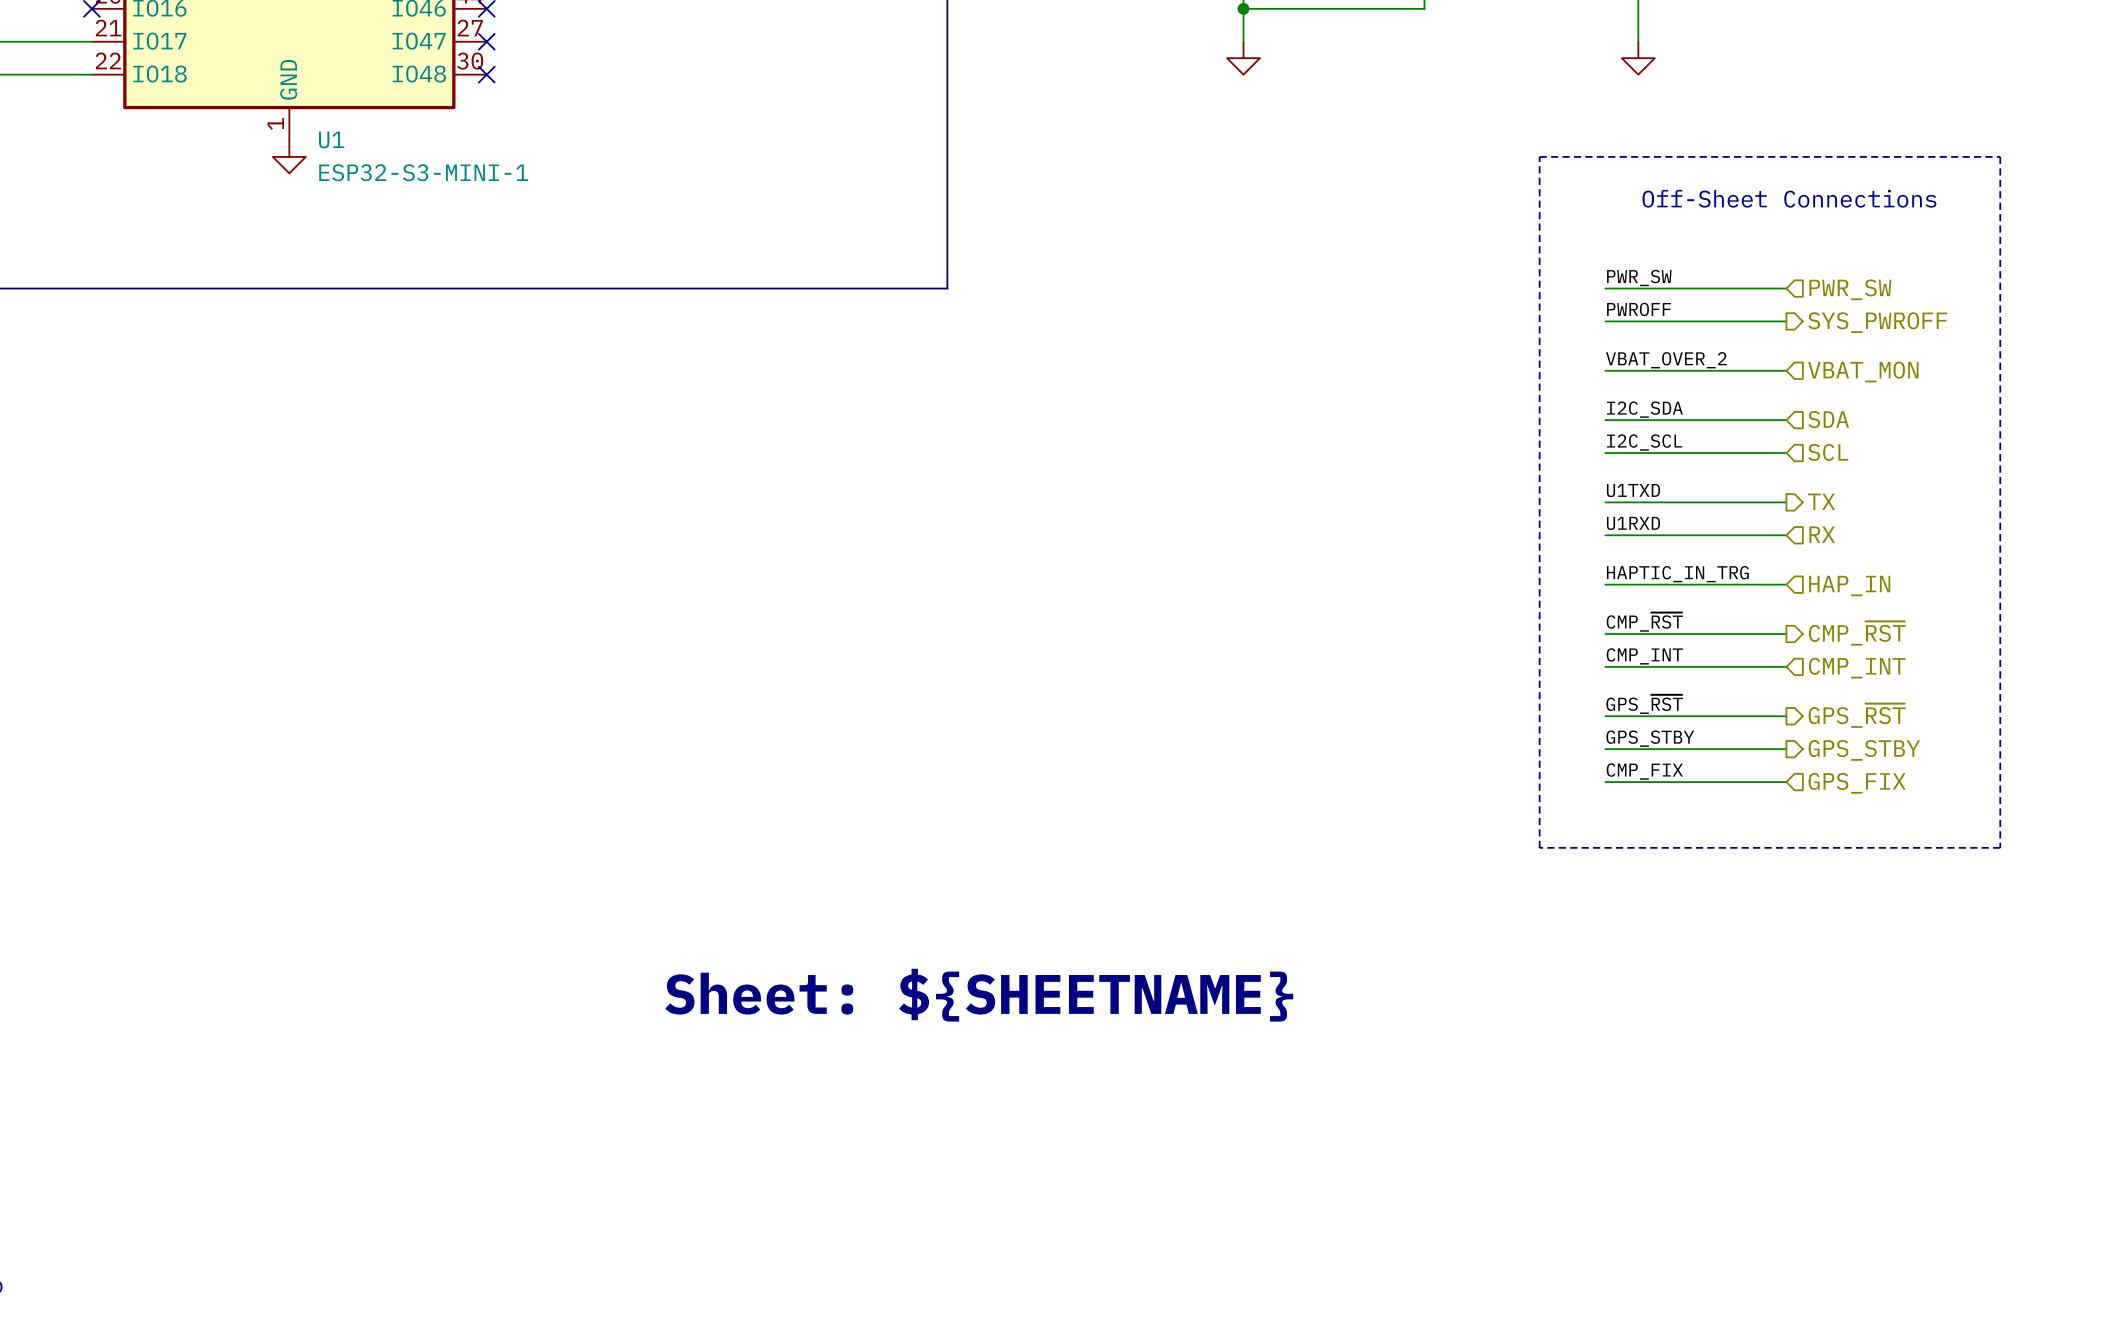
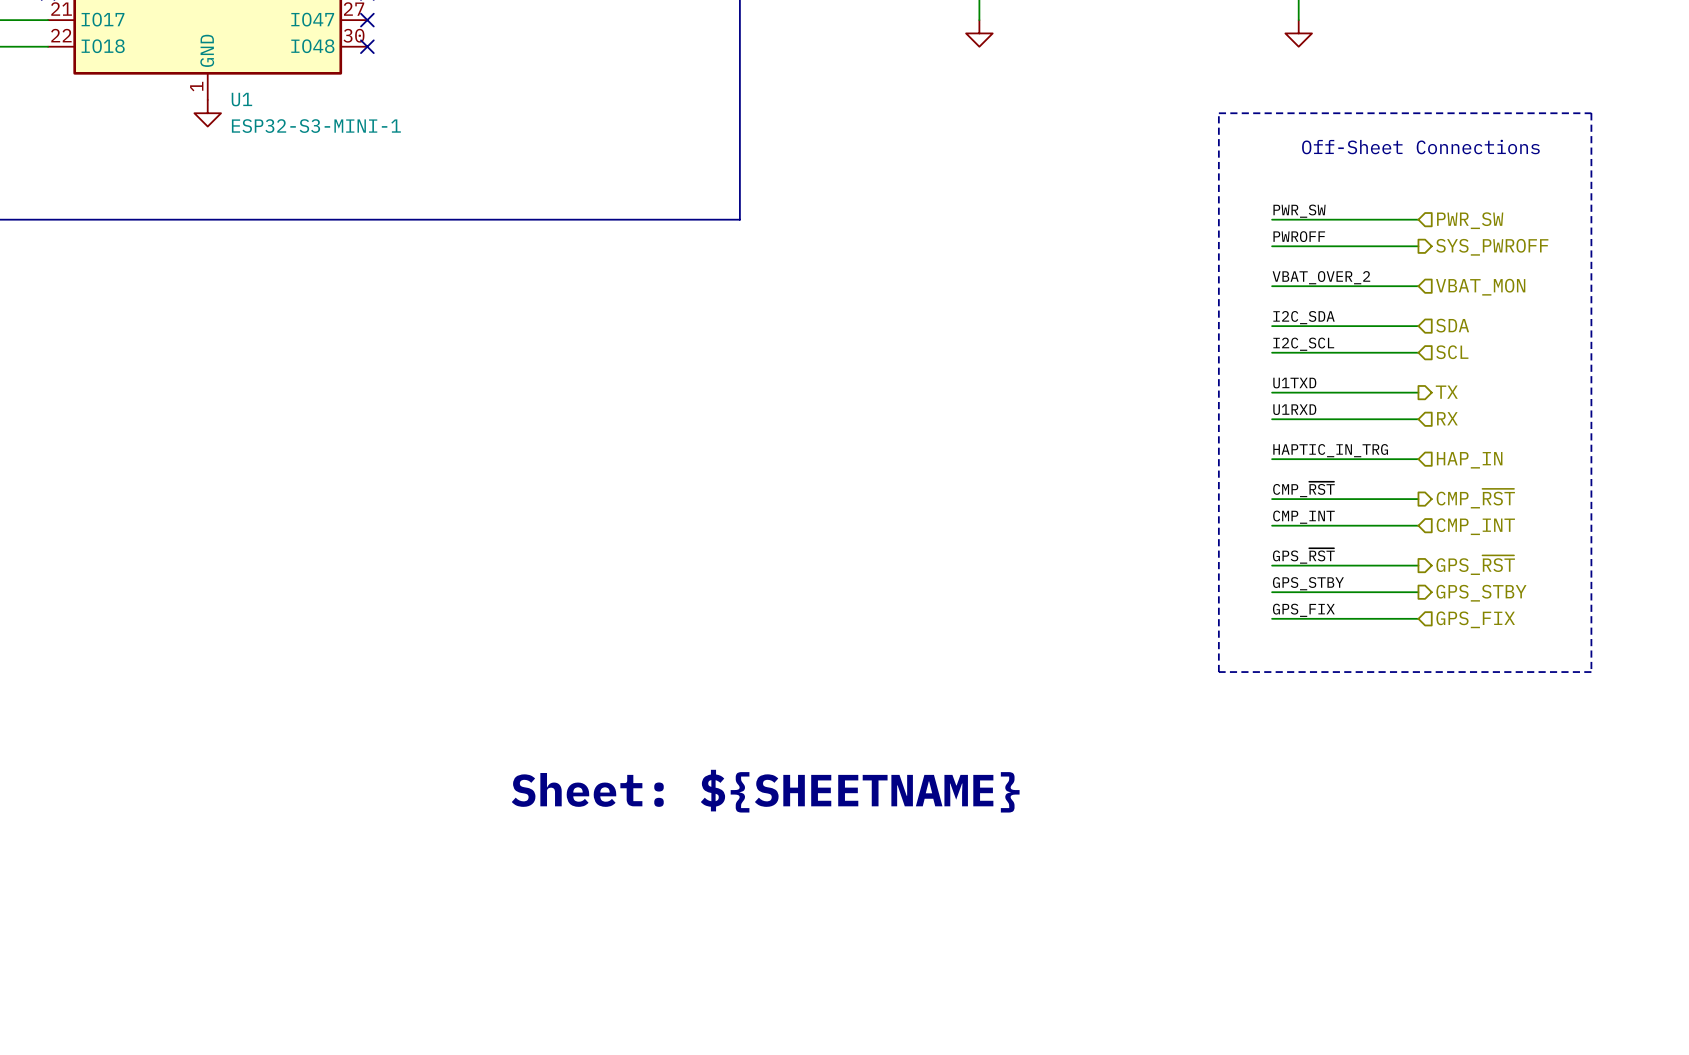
label: CMP_FIX (1644, 771) -> GPS_FIX (1303, 610)

